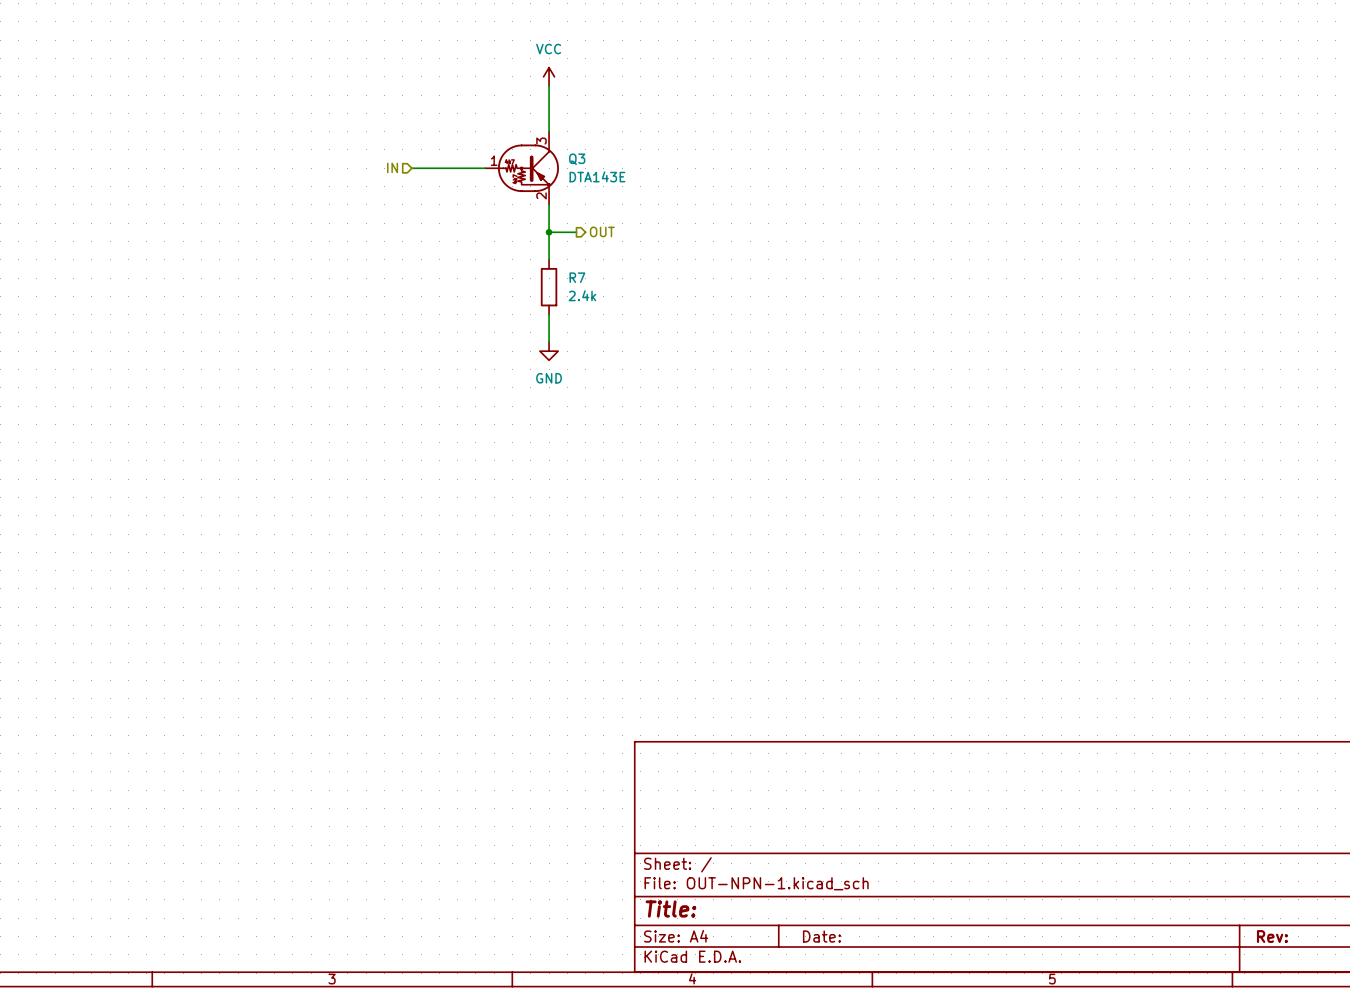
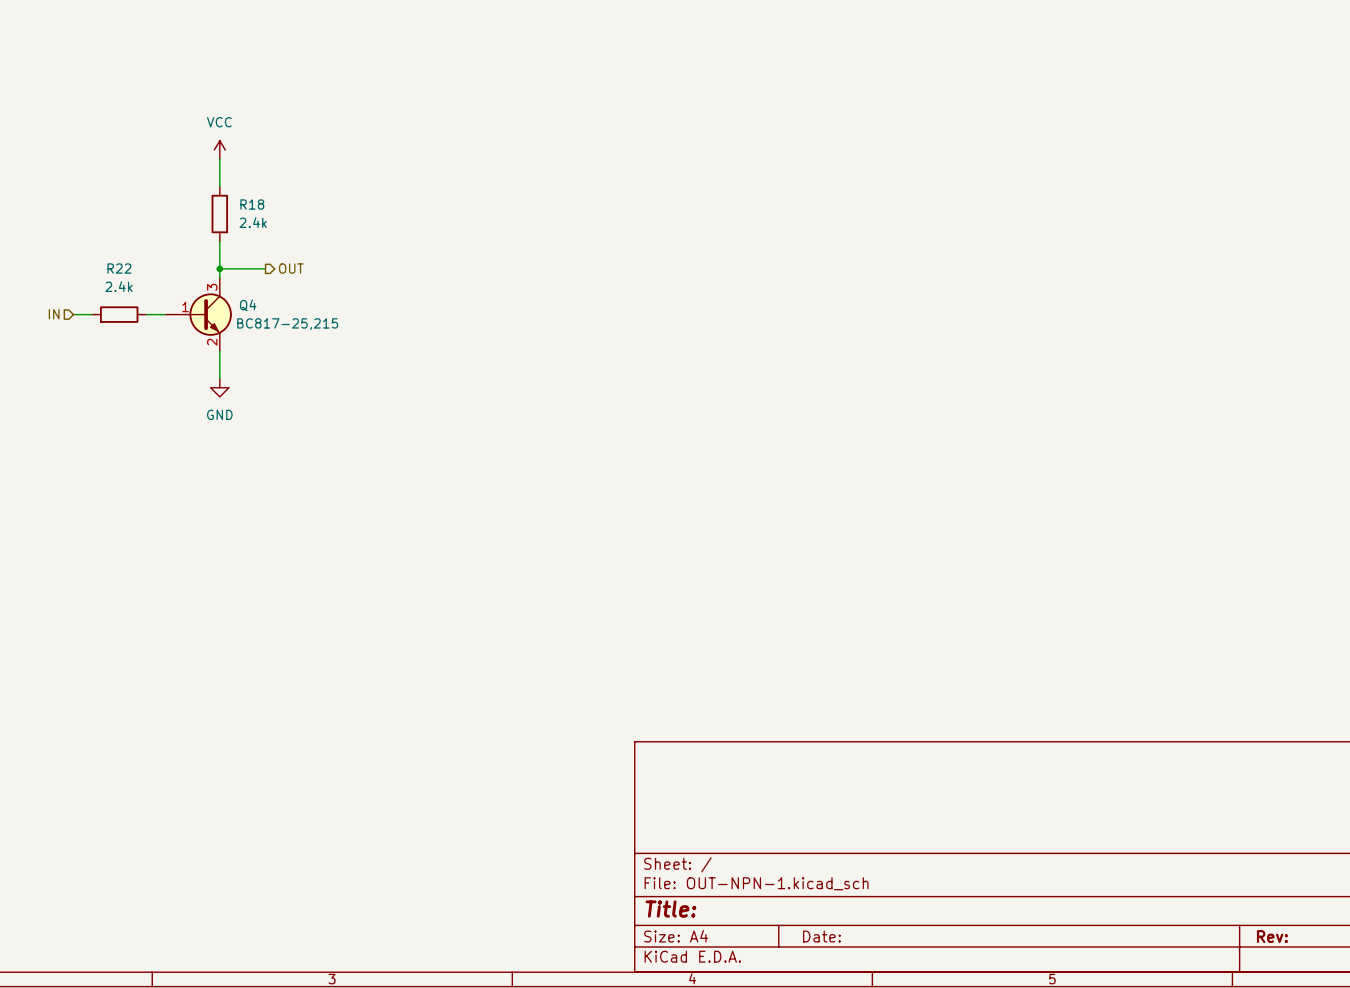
power symbol: VCC (549, 76) -> none
wire: (549, 85) (549, 131) -> none
power symbol: none -> VCC (219, 149)
wire: none -> (219, 159) (219, 186)
hierarchical label: IN (392, 167) -> none
wire: (411, 168) (485, 168) -> none
Q3: DTA143E (522, 168) -> none
wire: (549, 204) (549, 259) -> none
R18: none -> 2.4k (219, 214)
hierarchical label: OUT (602, 231) -> none
wire: (549, 232) (576, 232) -> none
junction: (549, 232) -> none
wire: none -> (219, 241) (219, 278)
wire: none -> (219, 268) (265, 268)
junction: none -> (219, 268)
hierarchical label: none -> OUT (291, 268)
R7: 2.4k (549, 287) -> none
hierarchical label: none -> IN (54, 314)
wire: none -> (73, 314) (91, 314)
R22: none -> 2.4k (119, 314)
wire: none -> (146, 314) (164, 314)
Q4: none -> (198, 314)
wire: (549, 314) (549, 342) -> none
wire: none -> (219, 351) (219, 378)
power symbol: GND (549, 351) -> none
power symbol: none -> GND (219, 387)

